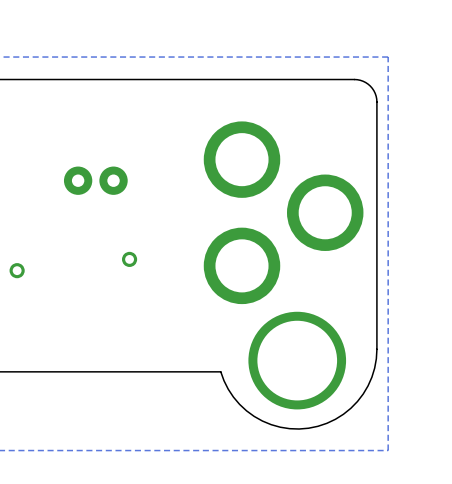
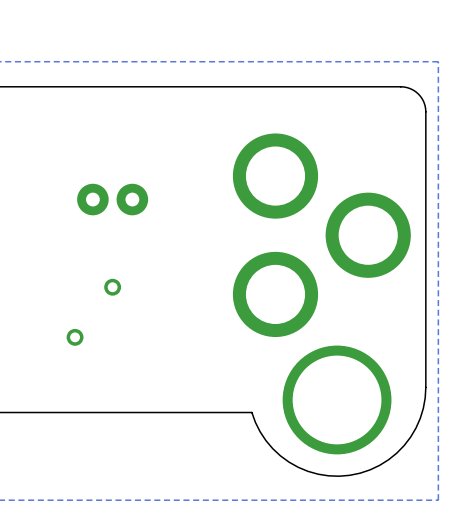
via position: (129, 259) -> (112, 287)
via: (17, 270) -> none
via: none -> (75, 337)

